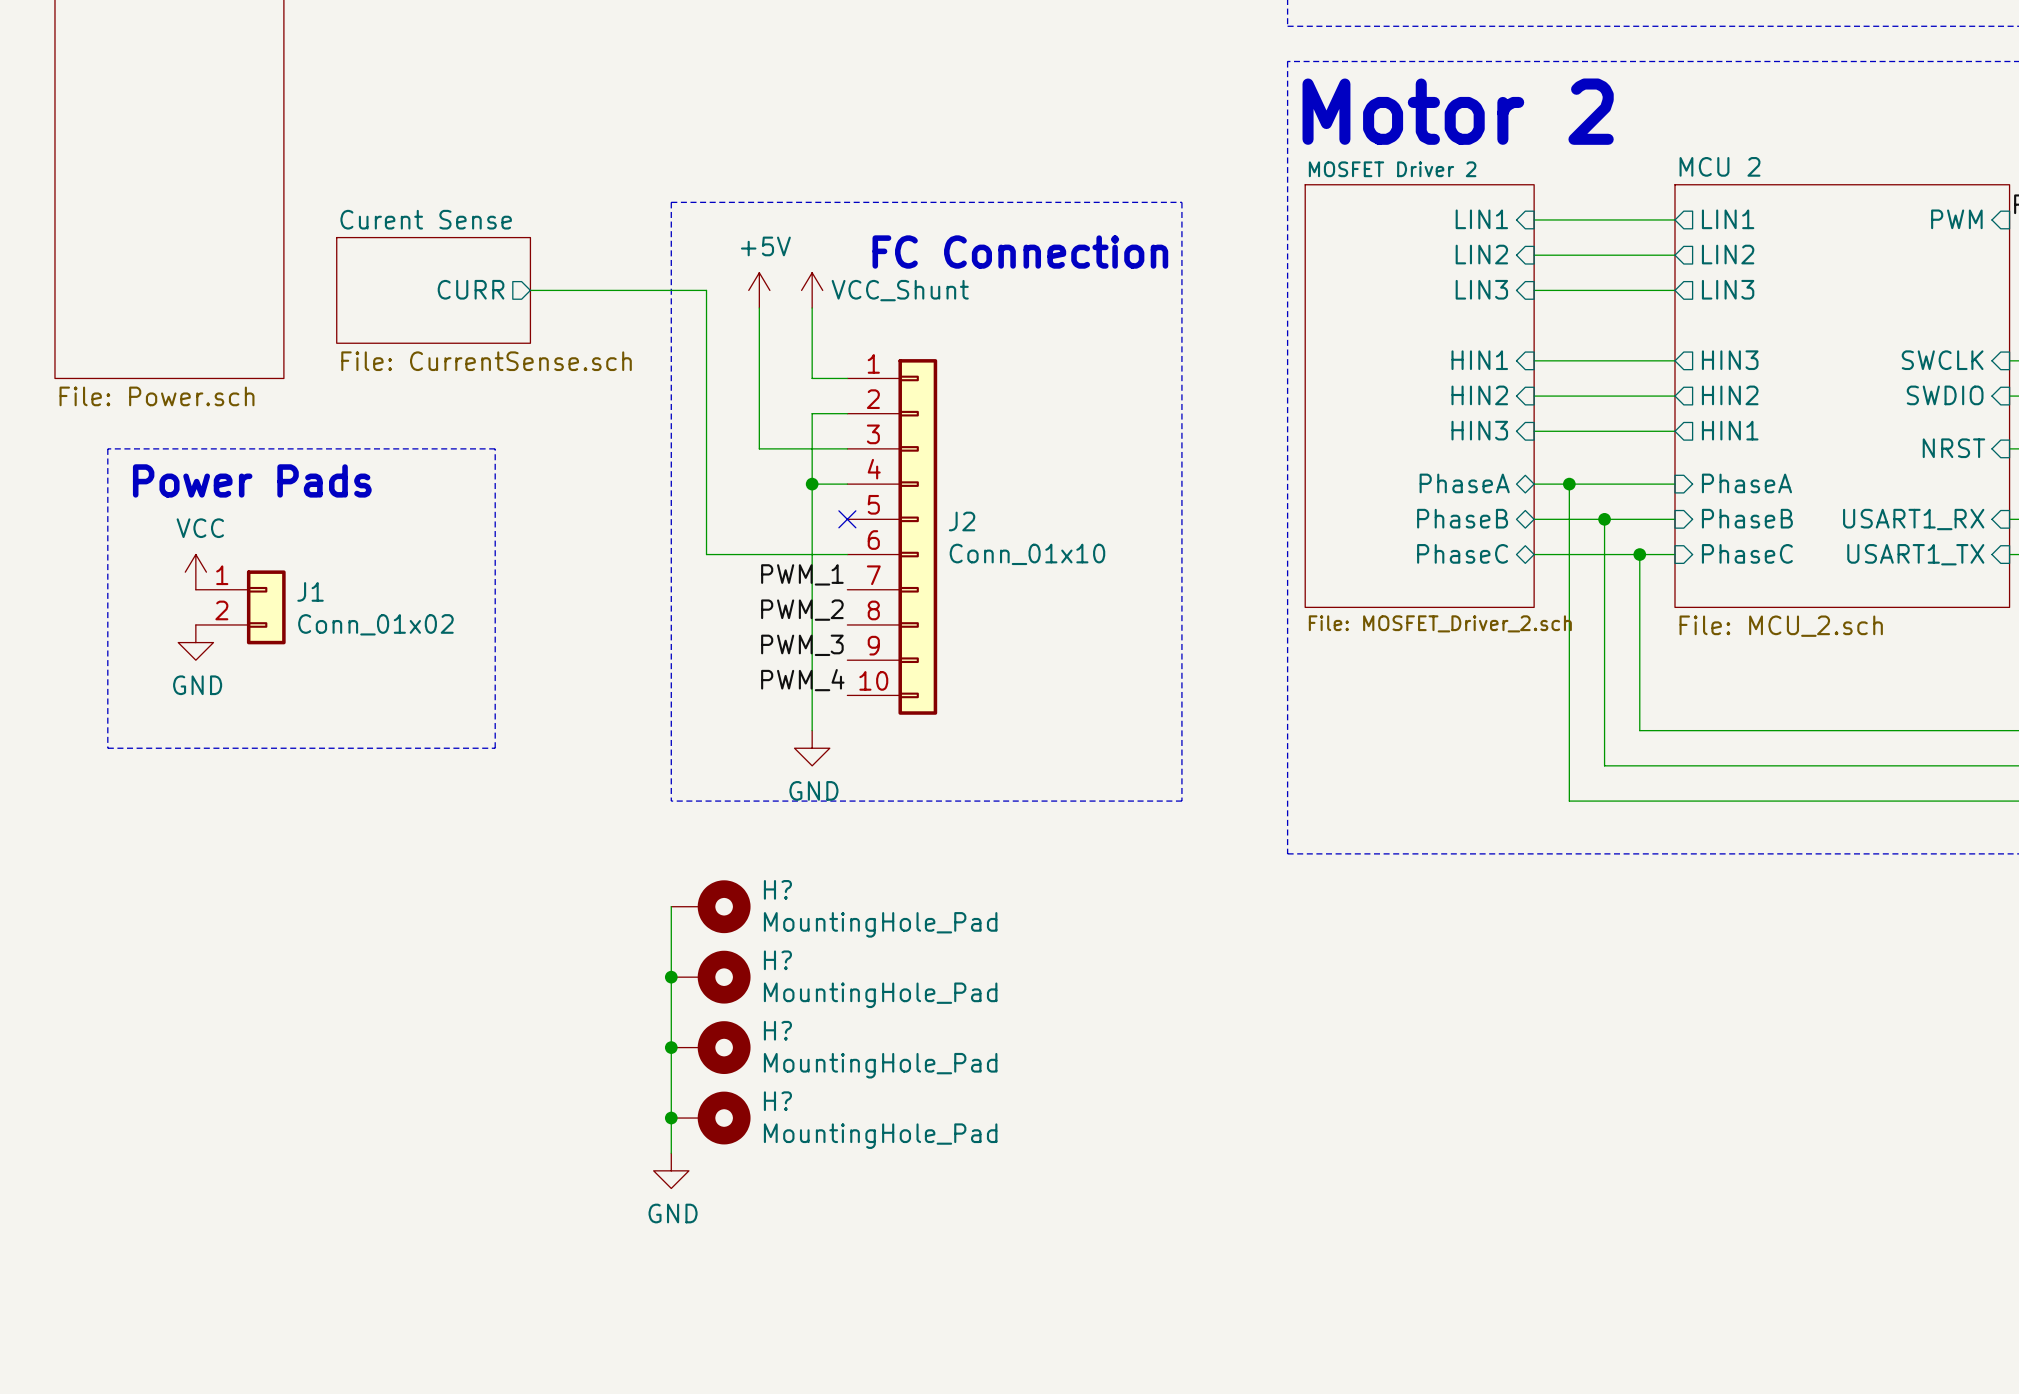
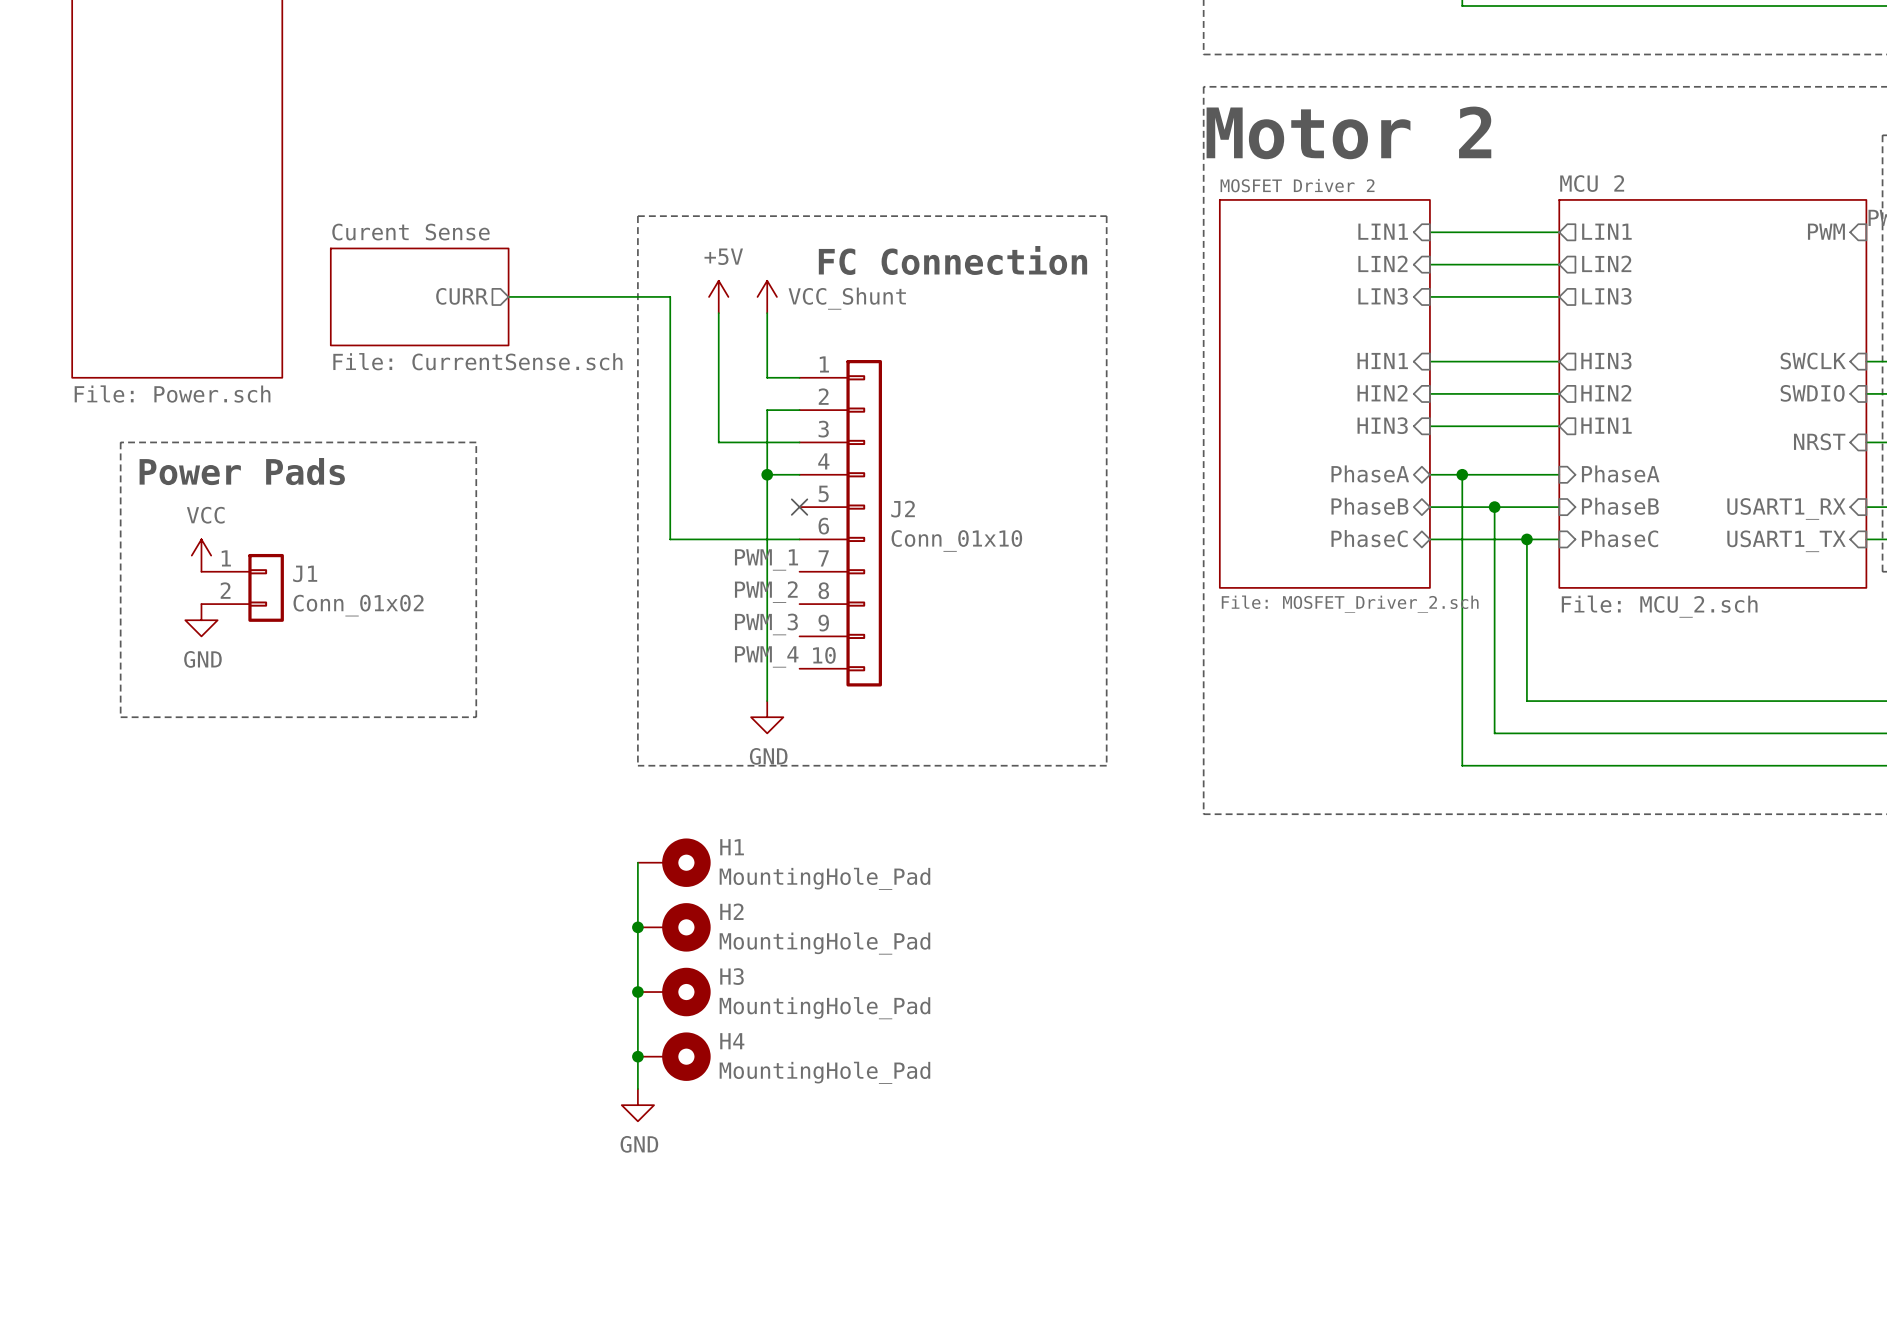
H? name: H? (777, 889) -> H1 (732, 847)
H? name: H? (777, 960) -> H2 (731, 911)
H? name: H? (777, 1030) -> H3 (731, 976)
H? name: H? (777, 1101) -> H4 (732, 1041)

